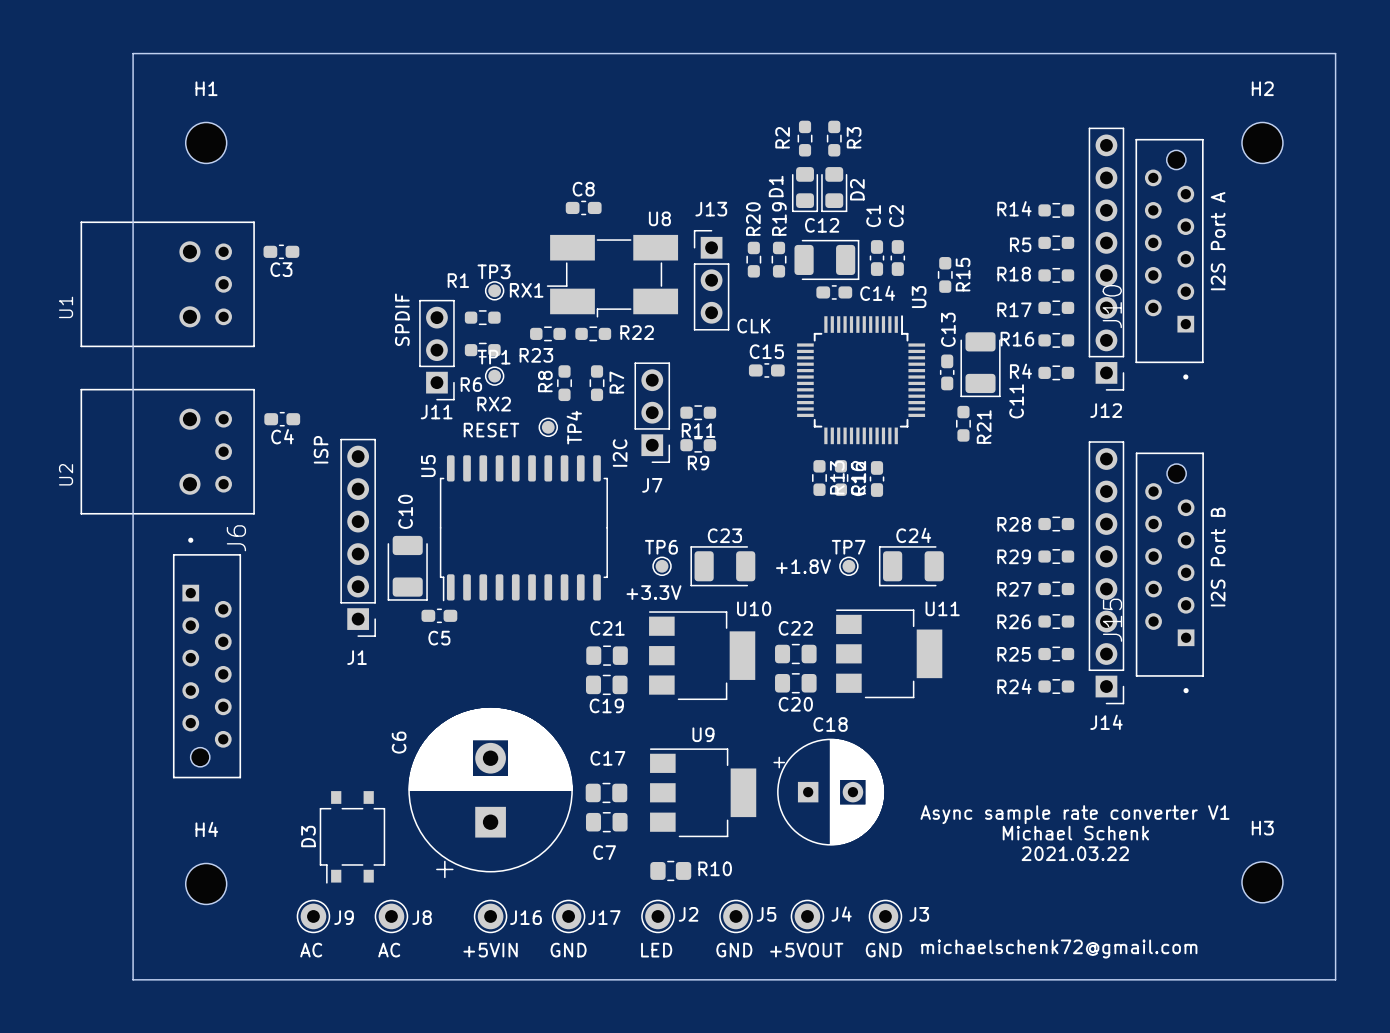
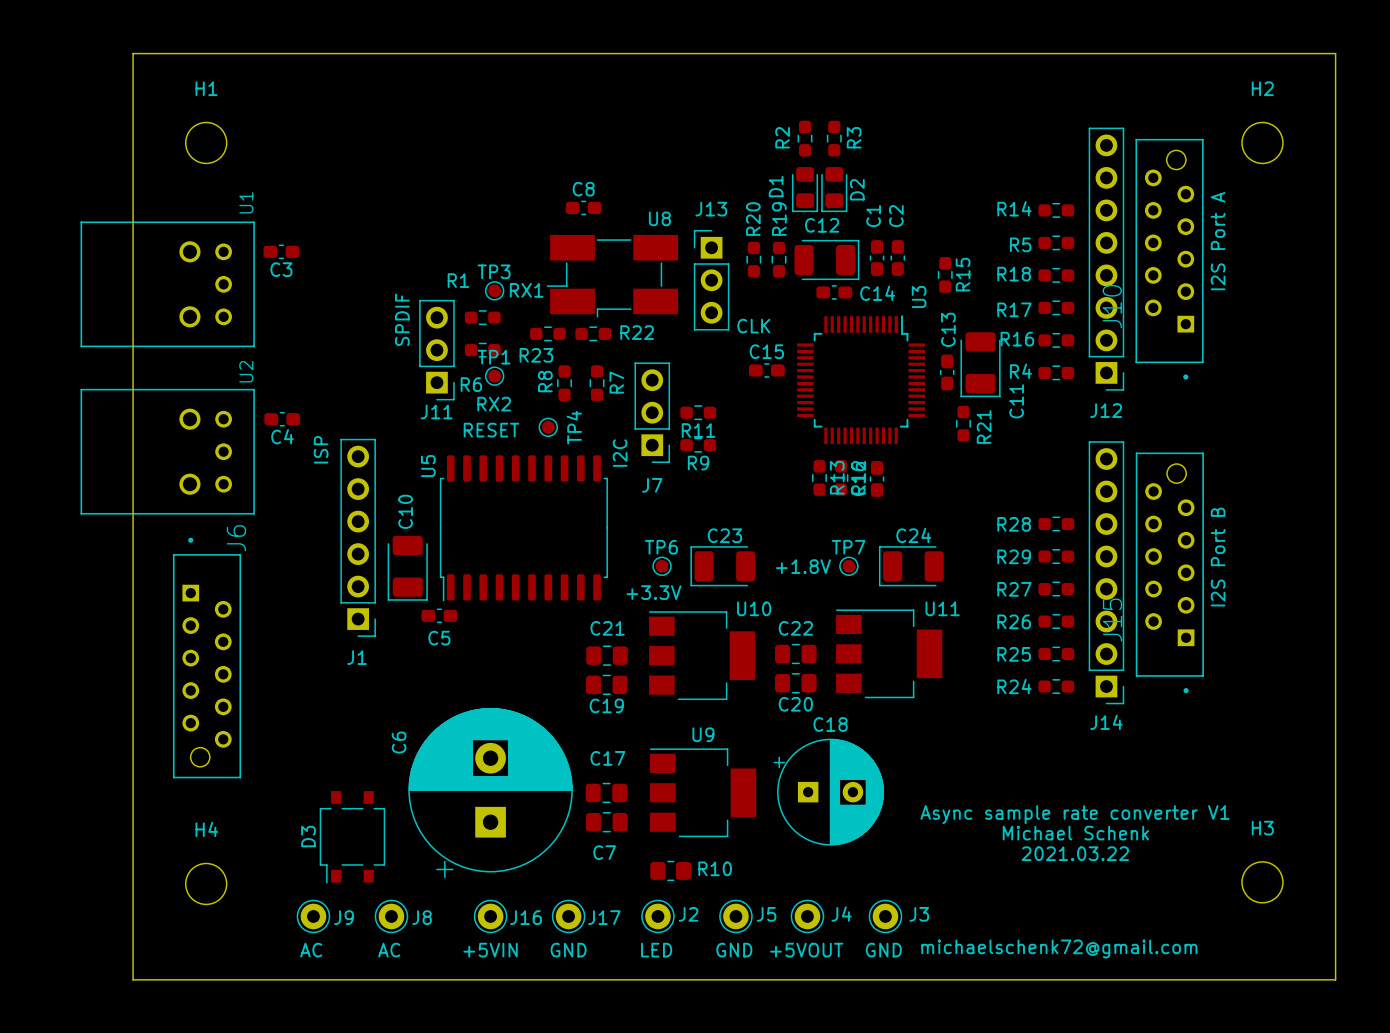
U1 name position: U1 (66, 307) -> U1 (246, 202)
U2 name position: U2 (66, 474) -> U2 (246, 371)

